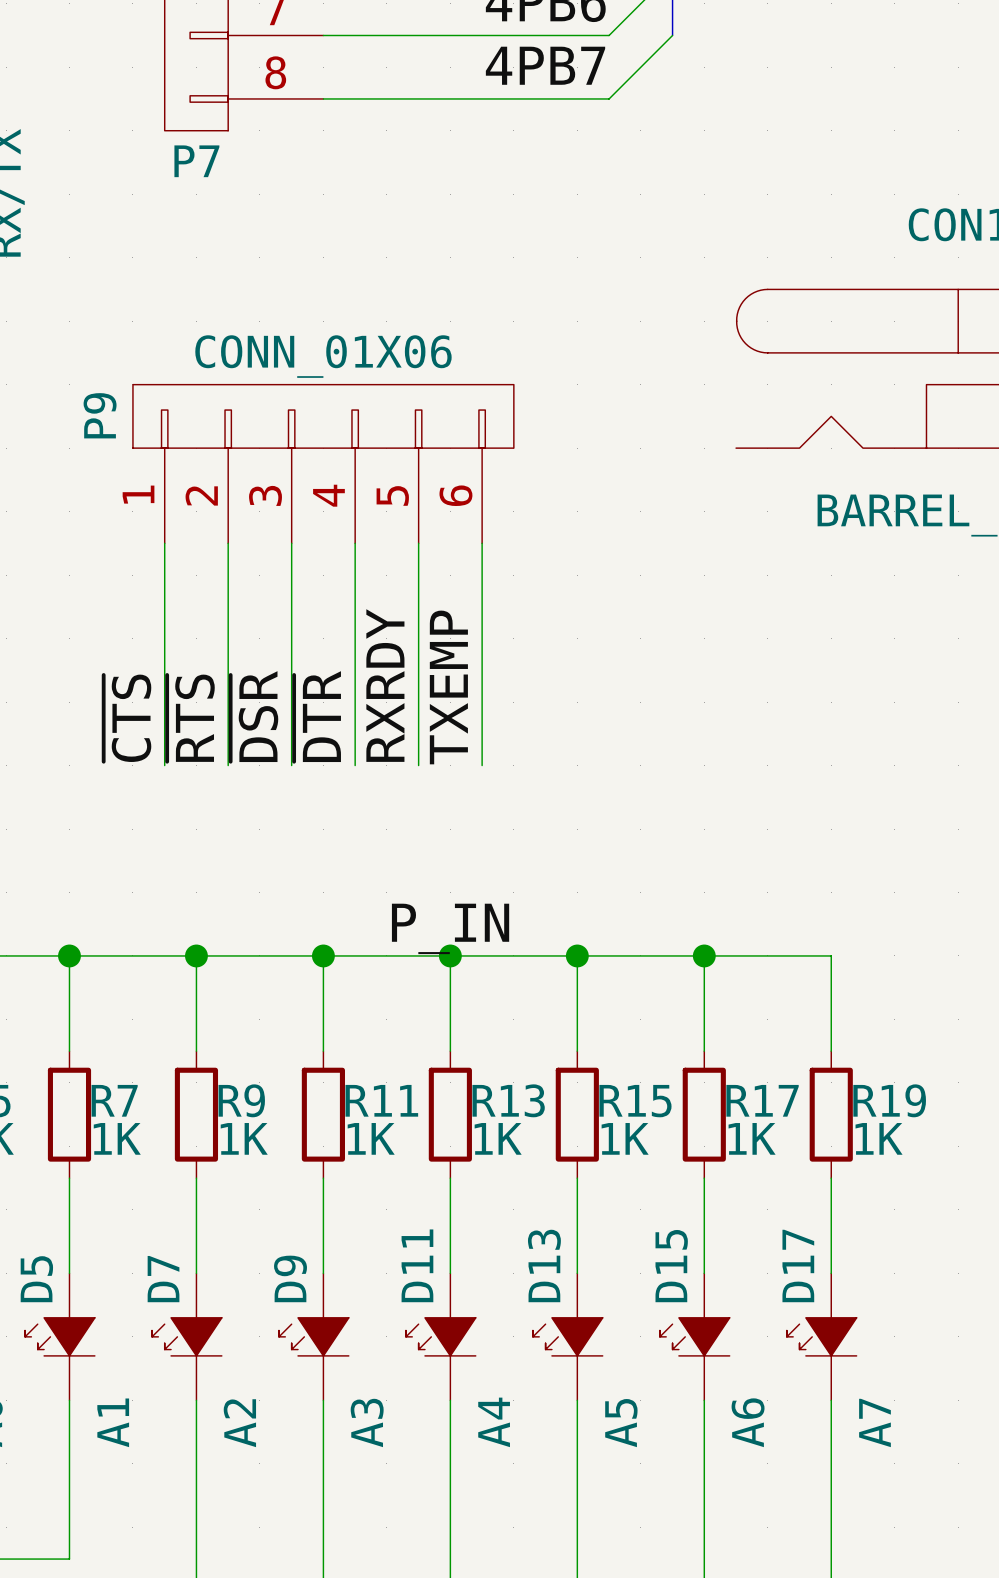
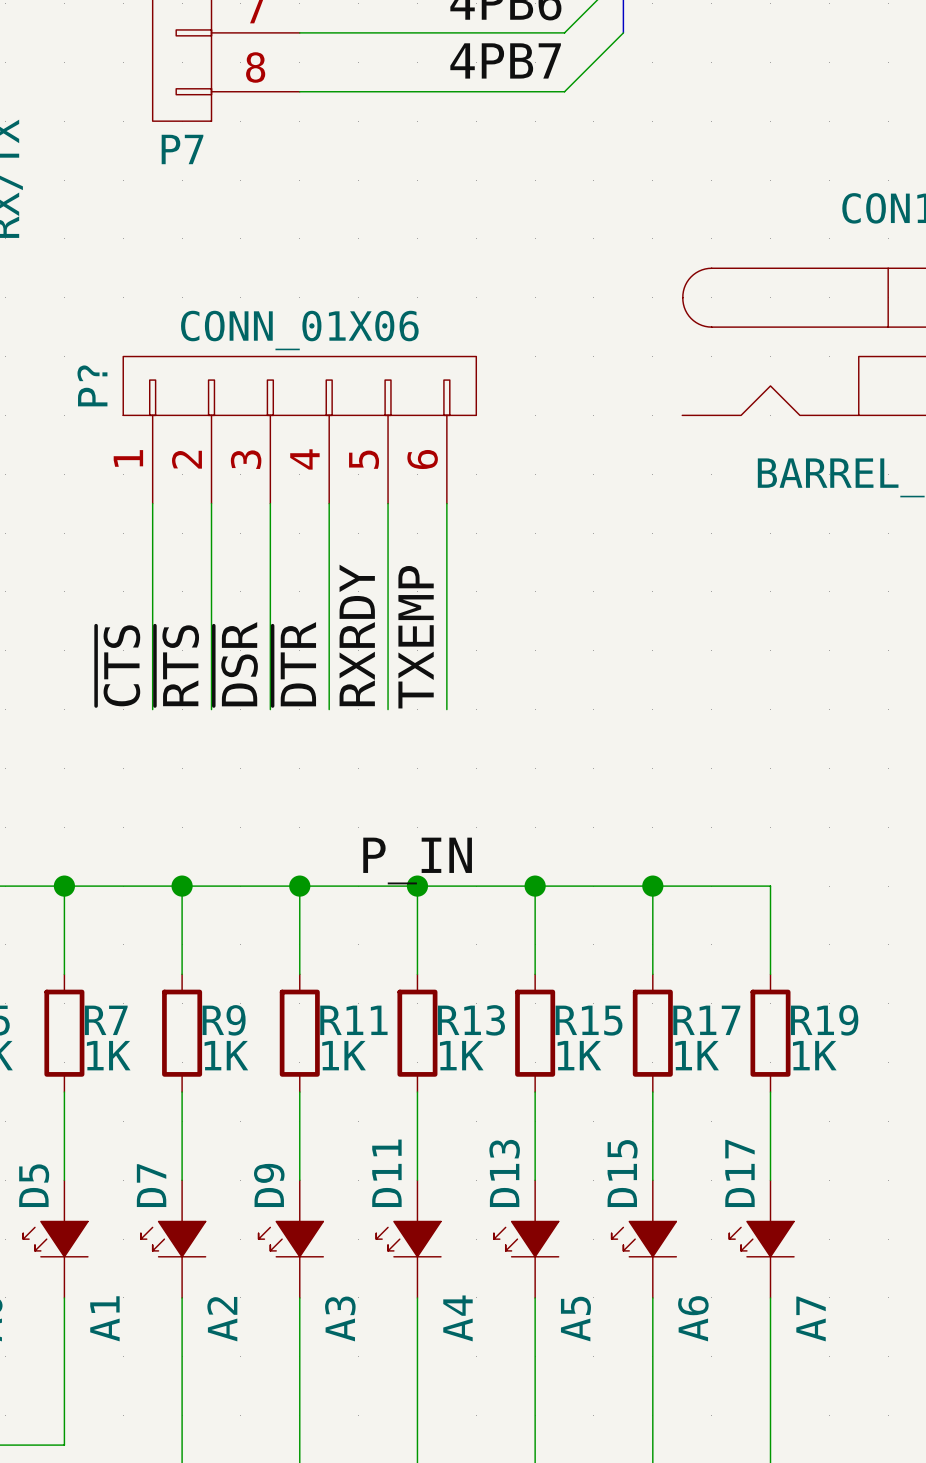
P9 name: P9 (100, 415) -> P? (92, 385)

